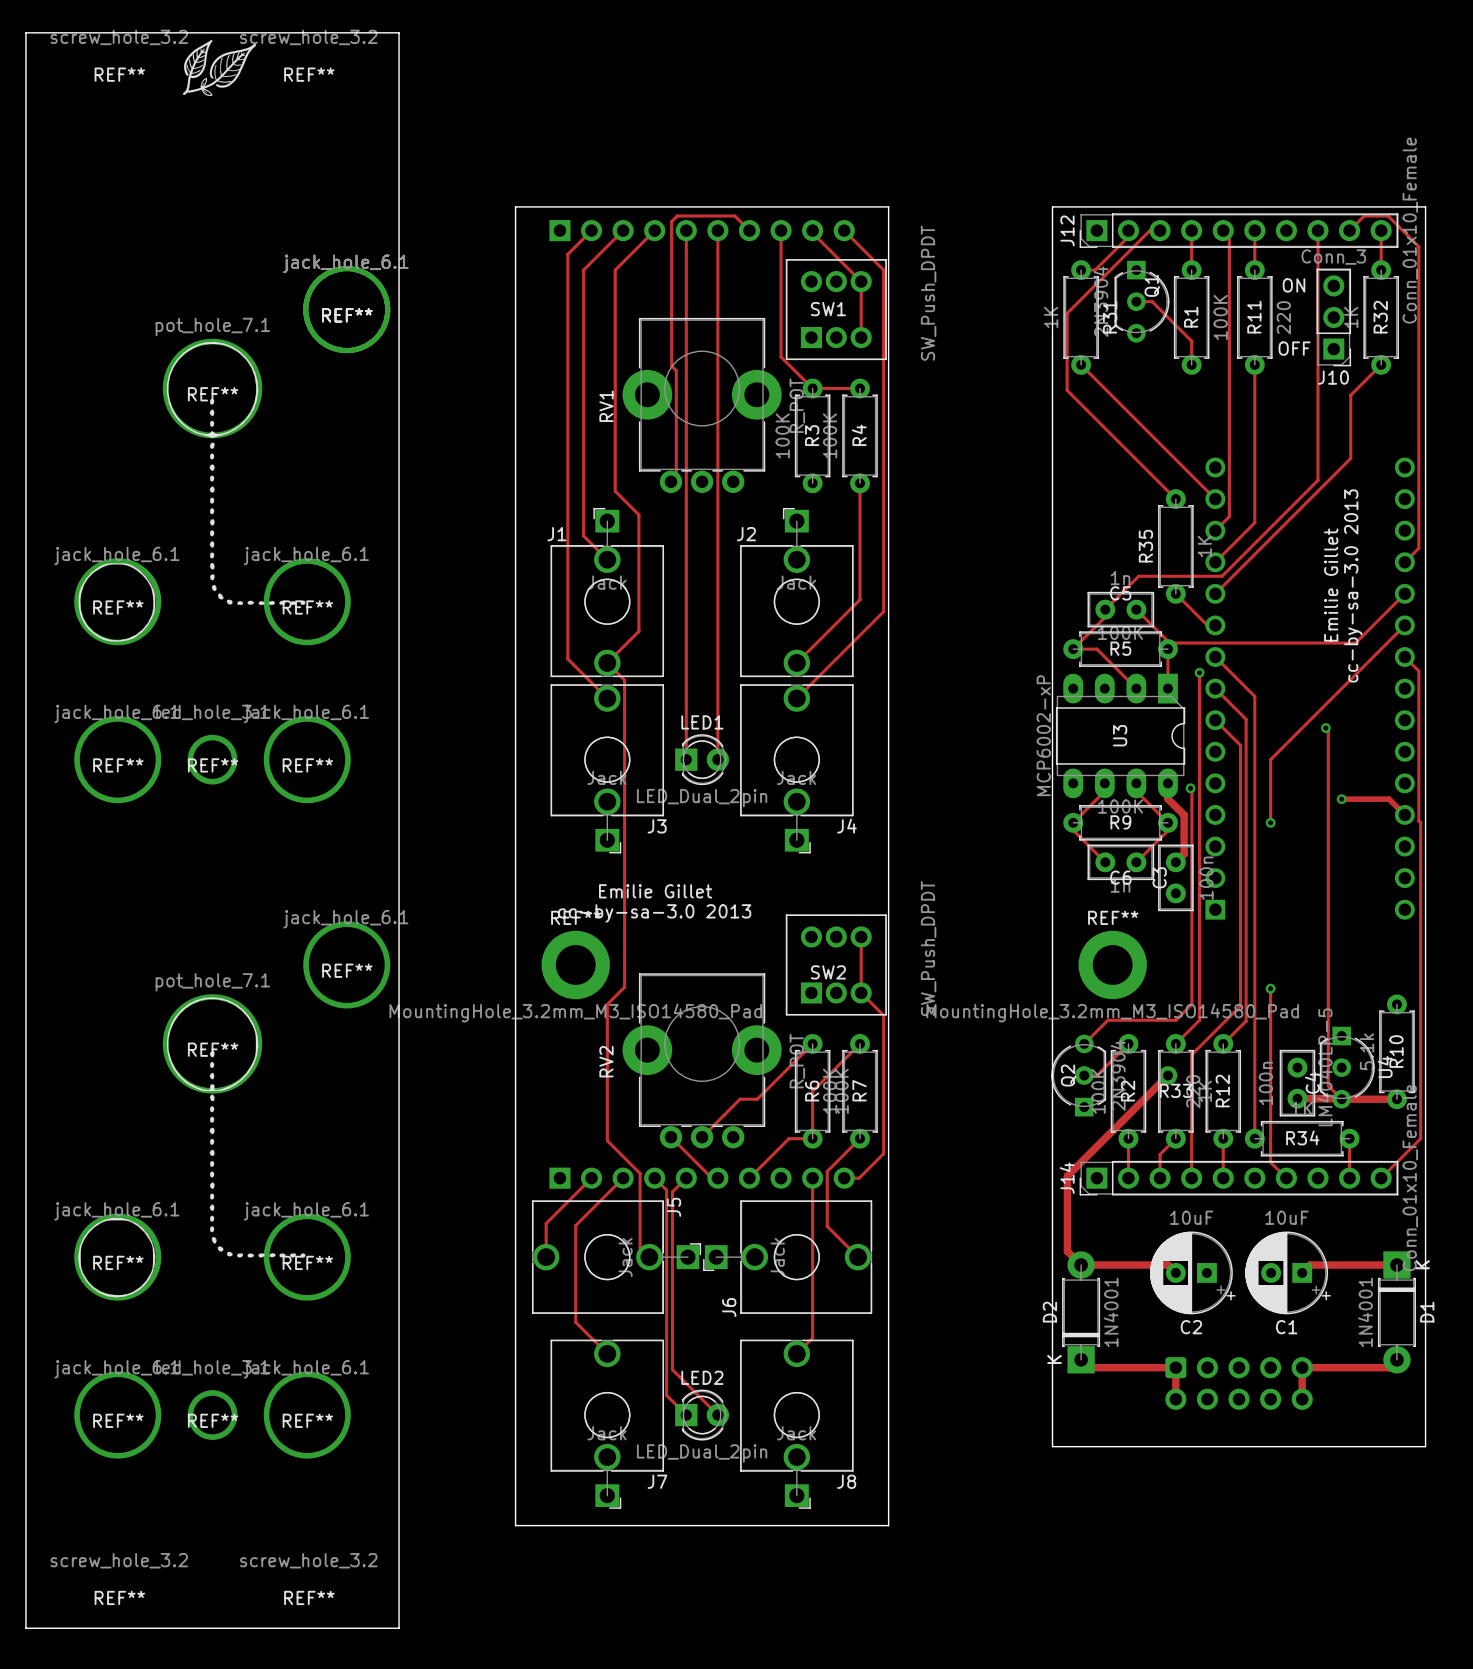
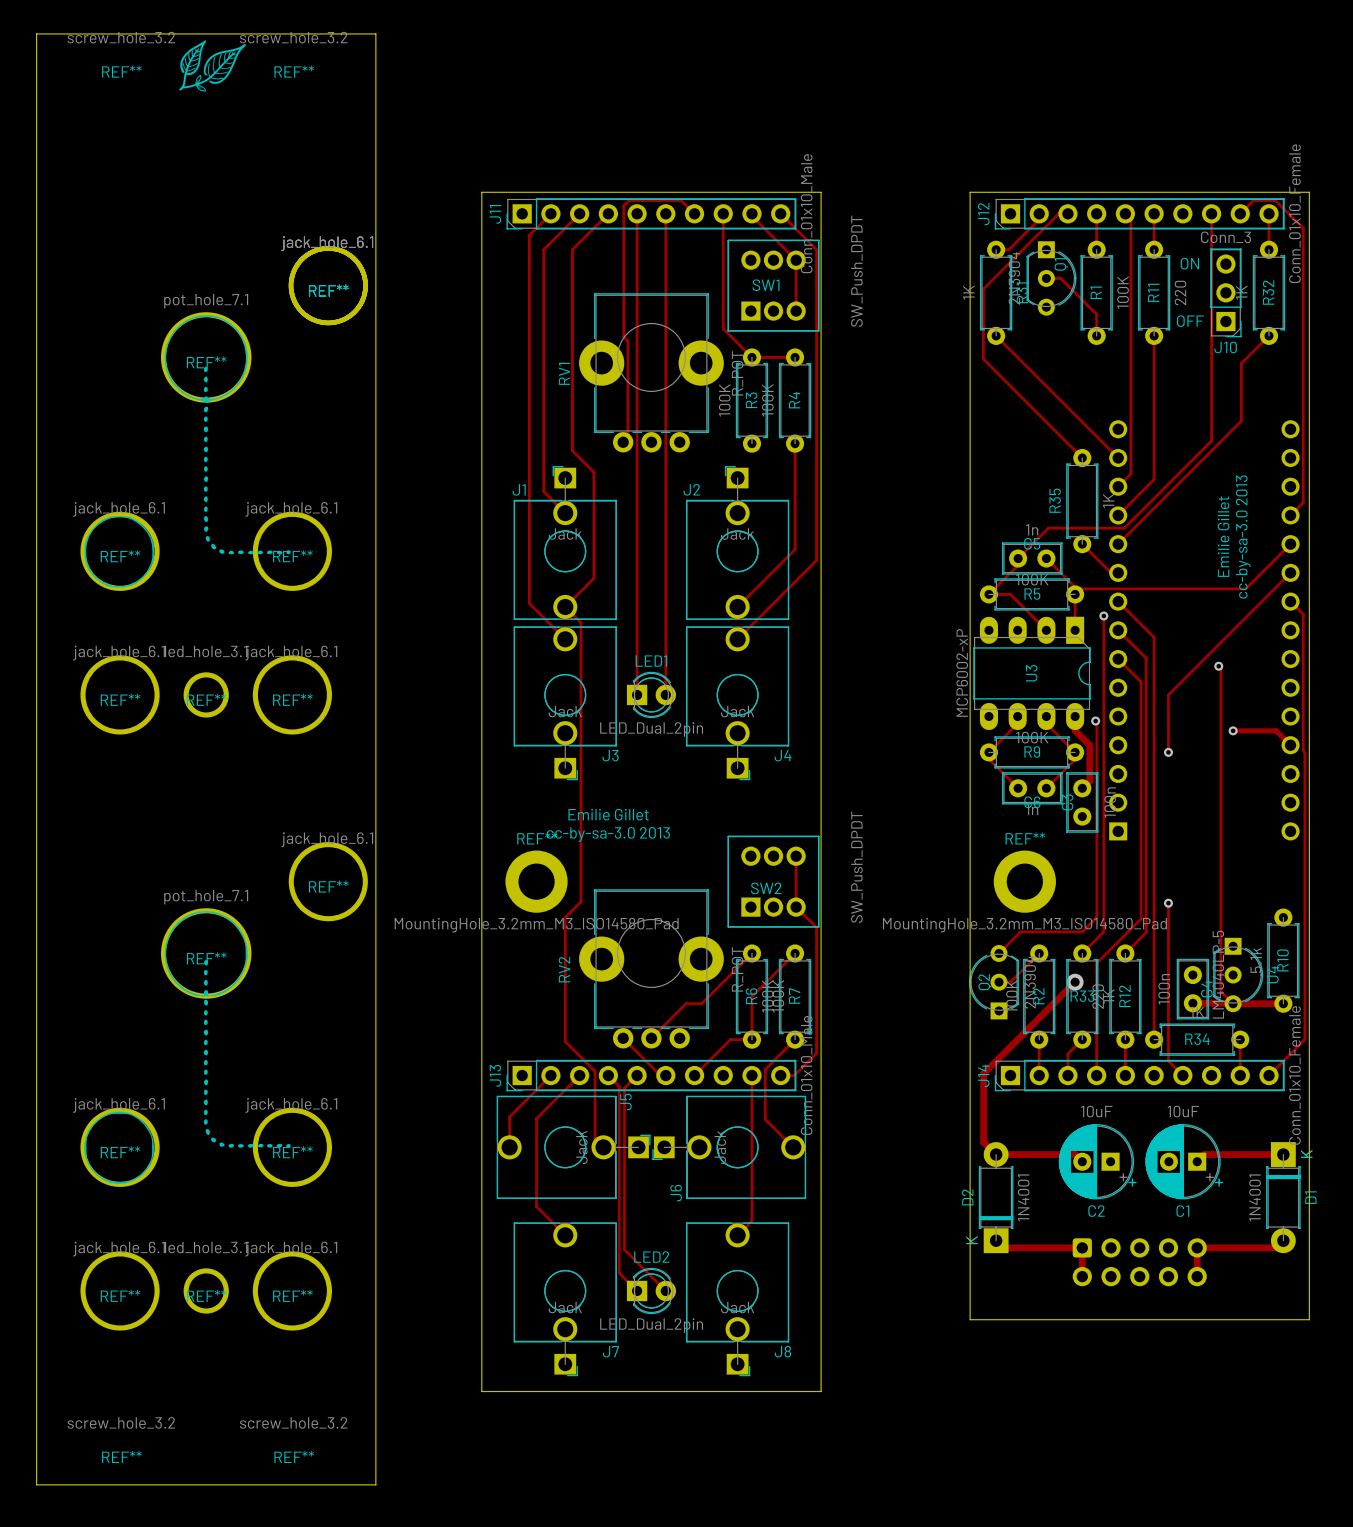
J11 side: bottom (702, 230) -> top (651, 213)
J13 side: bottom (702, 1178) -> top (651, 1075)

